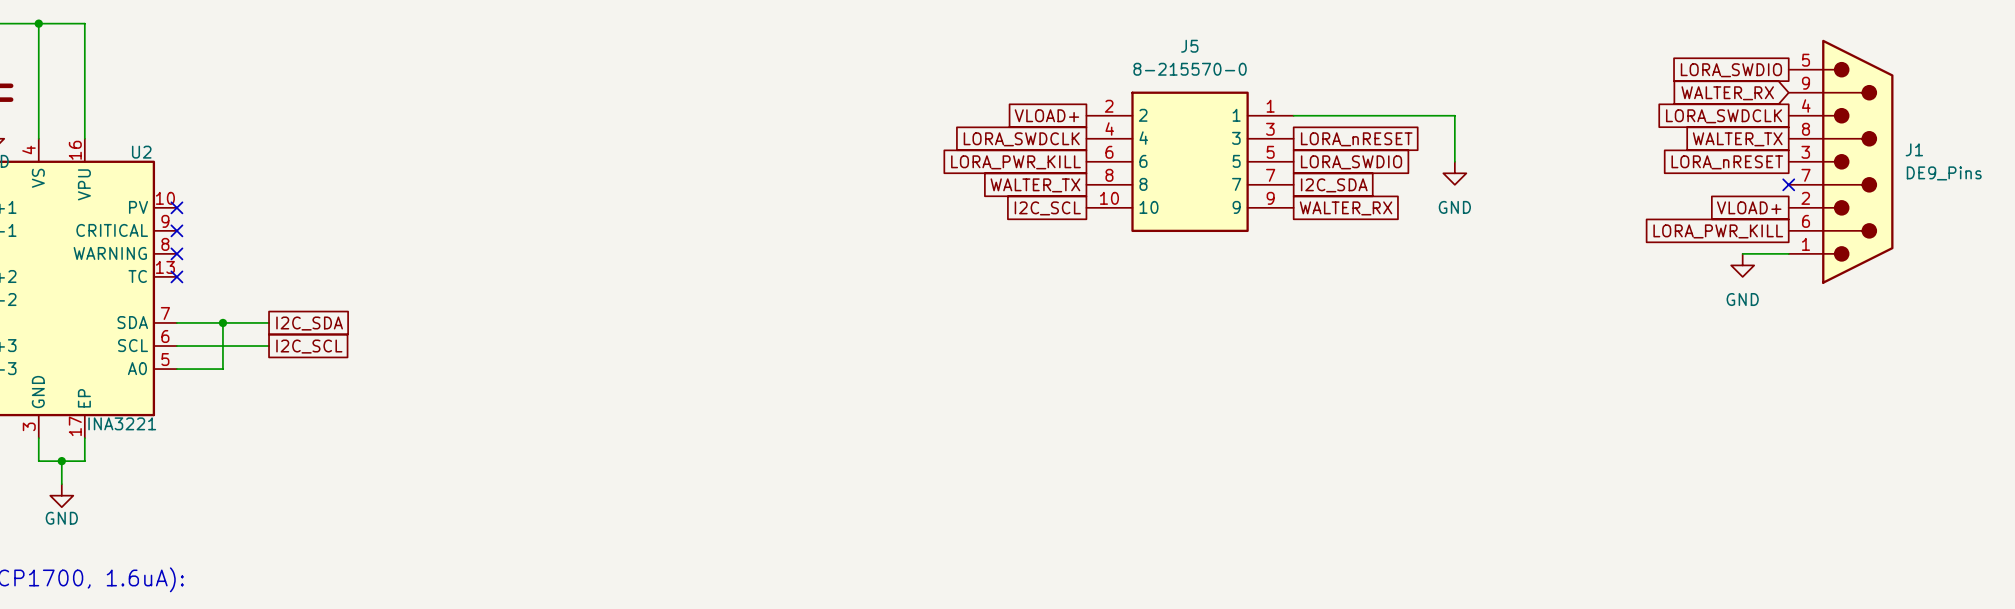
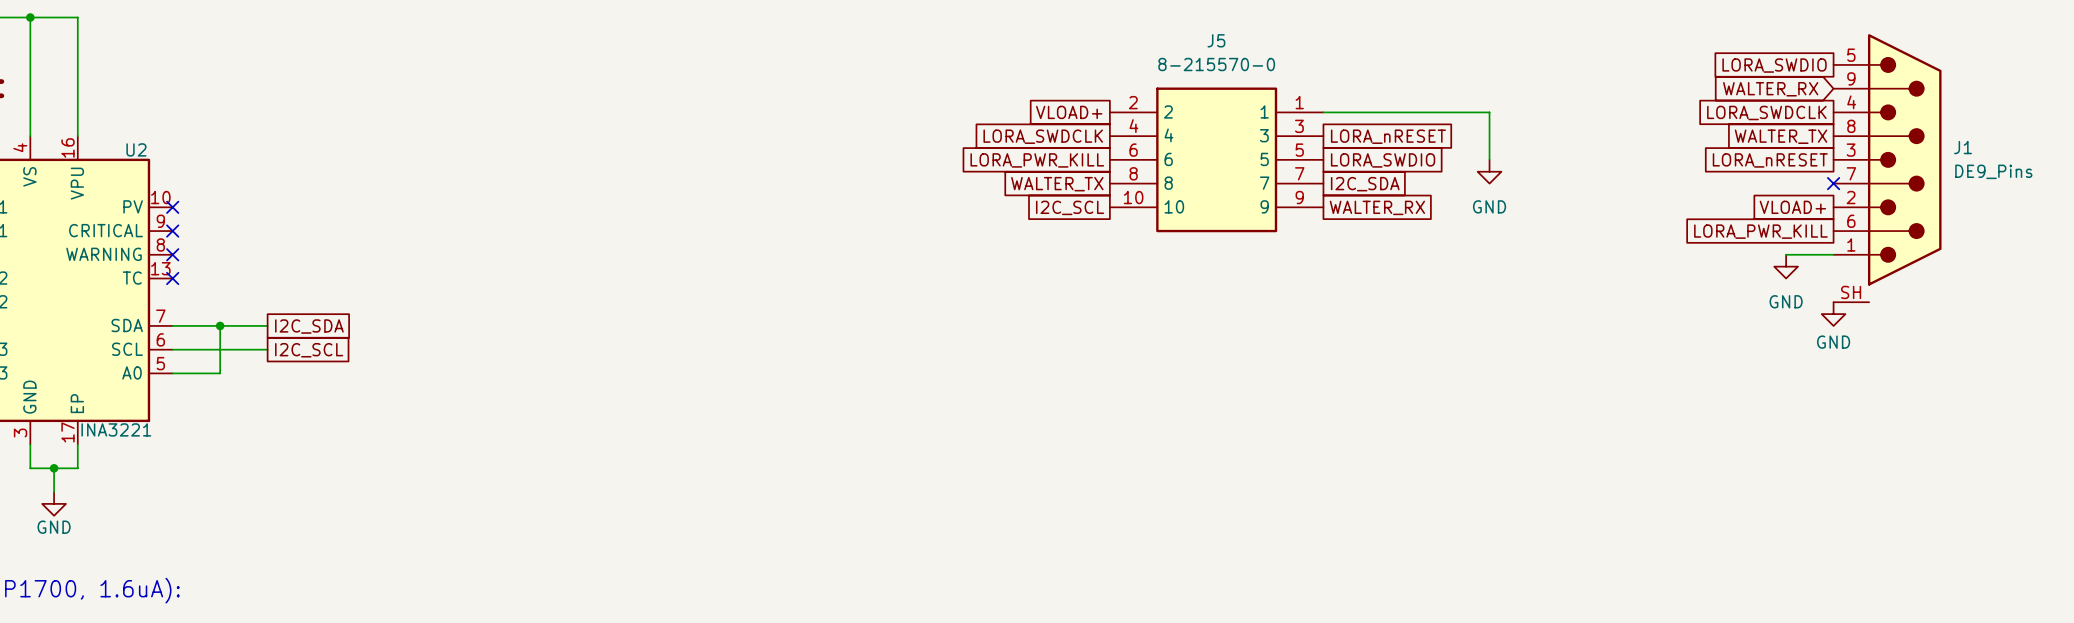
J1 symbol: [1788, 39, 1894, 284] -> [1833, 34, 1942, 303]
power symbol: none -> GND (1833, 314)

